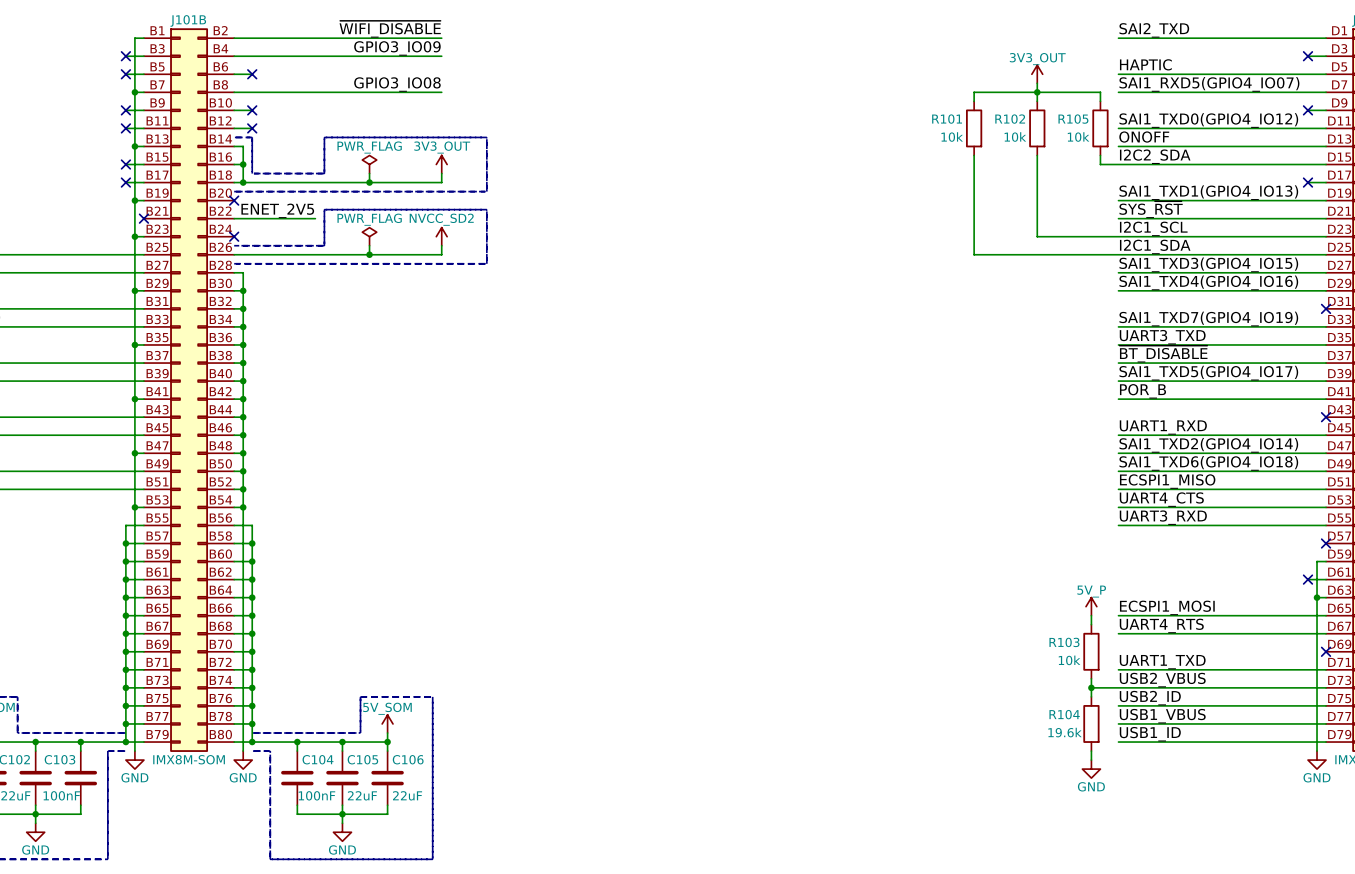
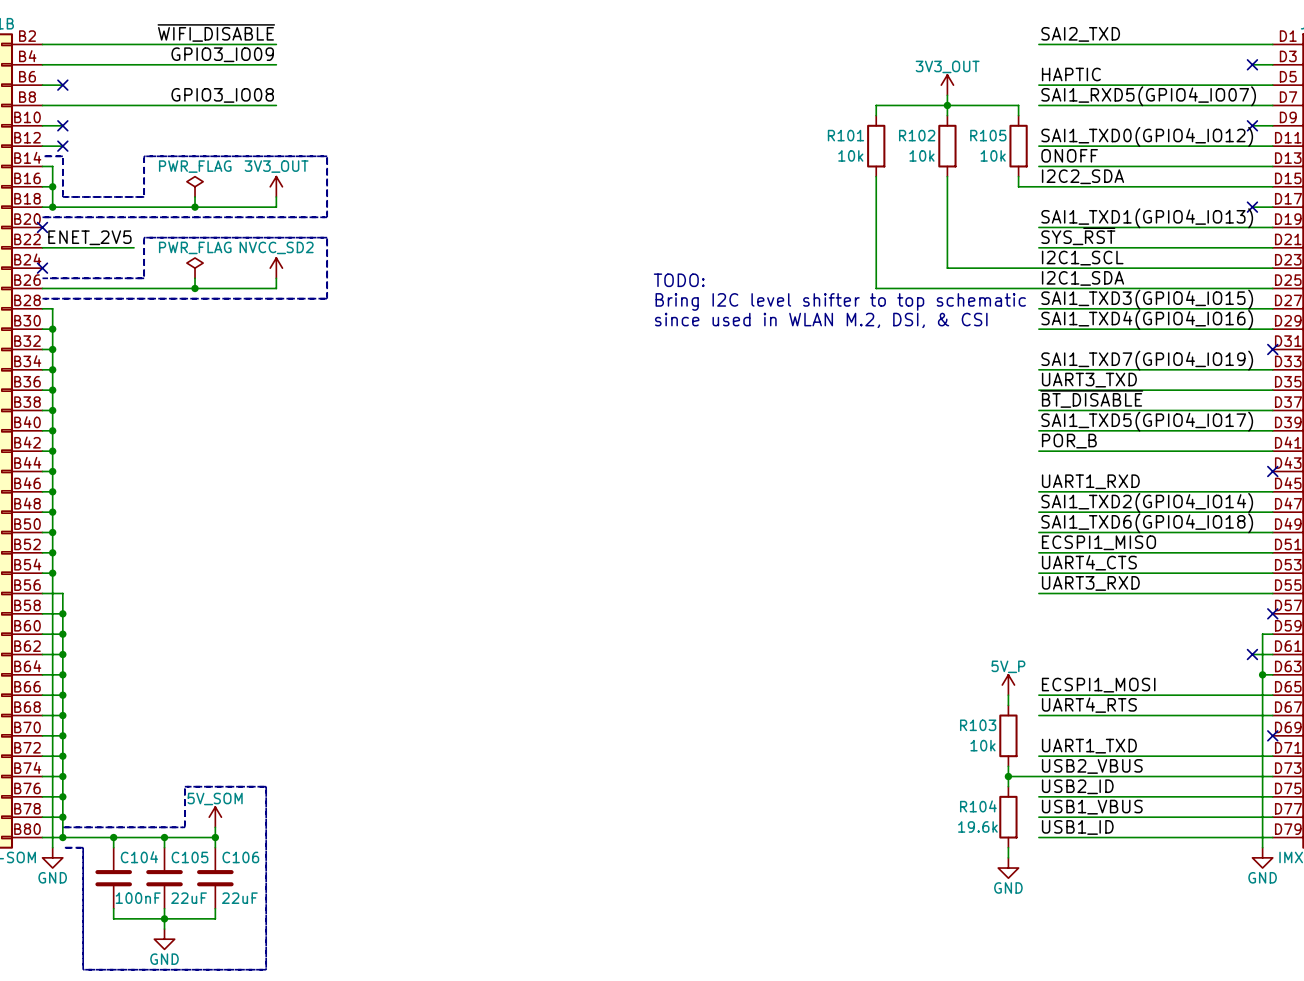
text: none -> TODO: (679, 280)
text: none -> Bring I2C level shifter to top schematic (840, 301)
text: none -> since used in WLAN M.2, DSI, & CSI (821, 320)

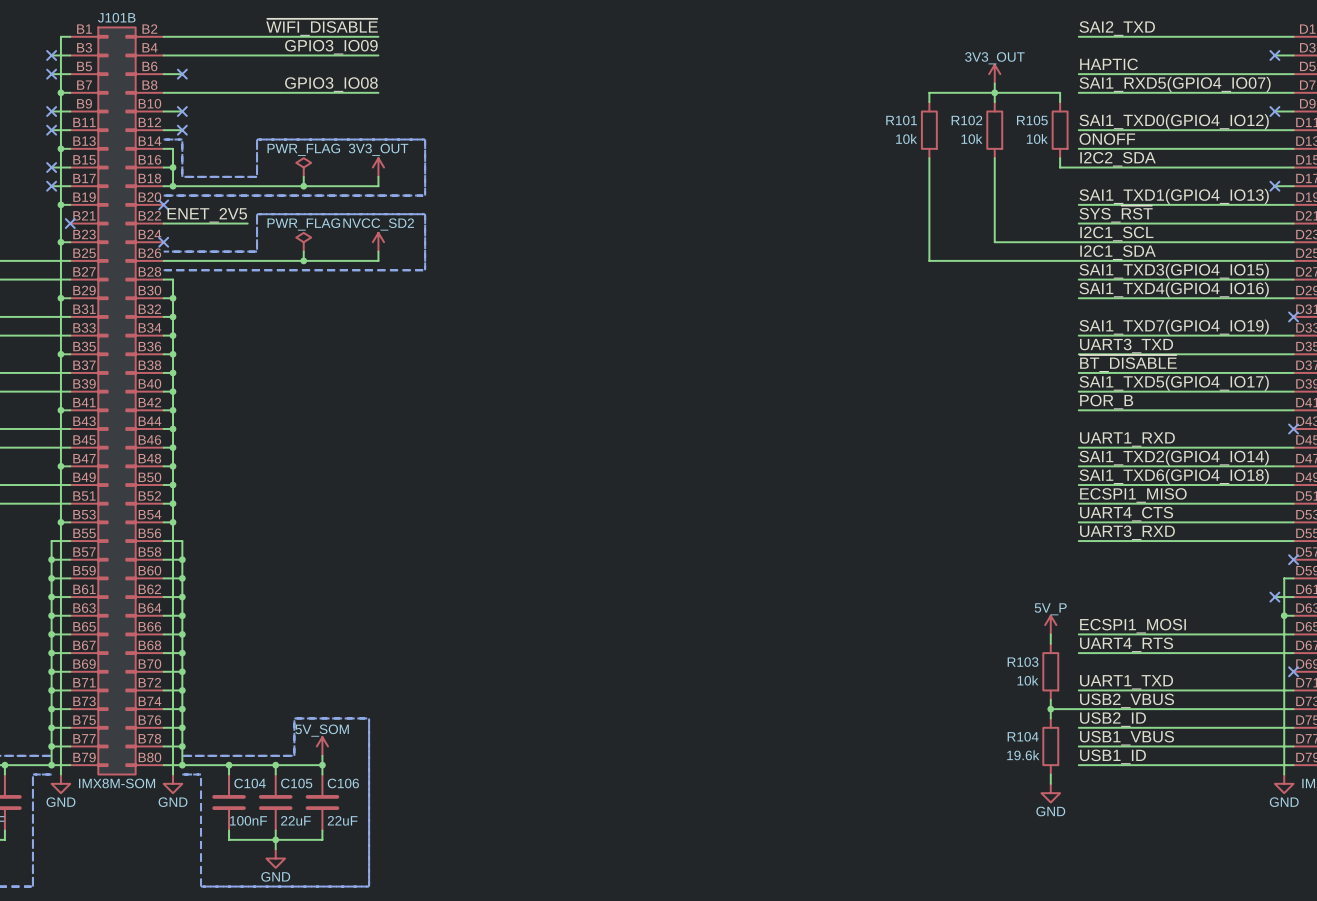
text: TODO: (679, 280) -> none
text: Bring I2C level shifter to top schematic (840, 301) -> none
text: since used in WLAN M.2, DSI, & CSI (821, 320) -> none

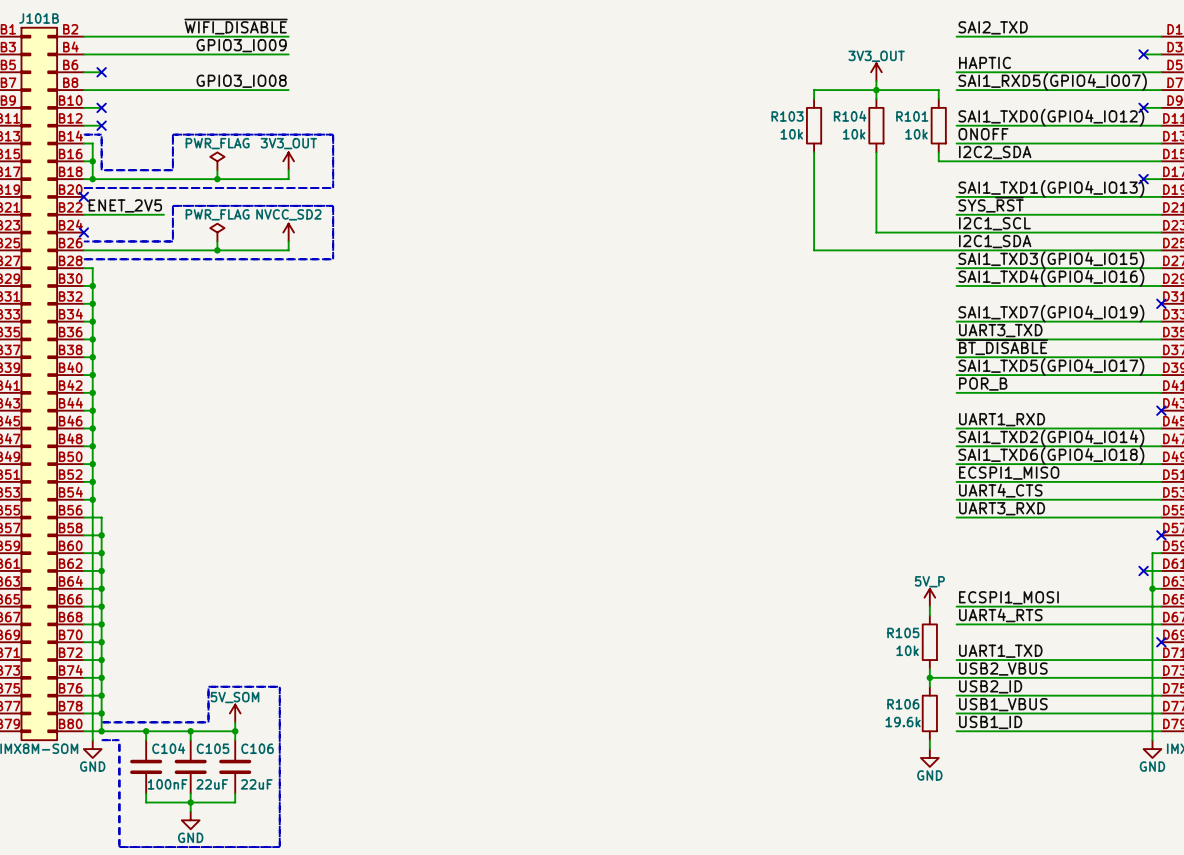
R101 name: R101 (901, 120) -> R103 (787, 116)
R102 name: R102 (966, 120) -> R104 (850, 116)
R105 name: R105 (1032, 120) -> R101 (912, 116)
R103 name: R103 (1023, 662) -> R105 (903, 632)
R104 name: R104 (1023, 736) -> R106 (903, 704)

